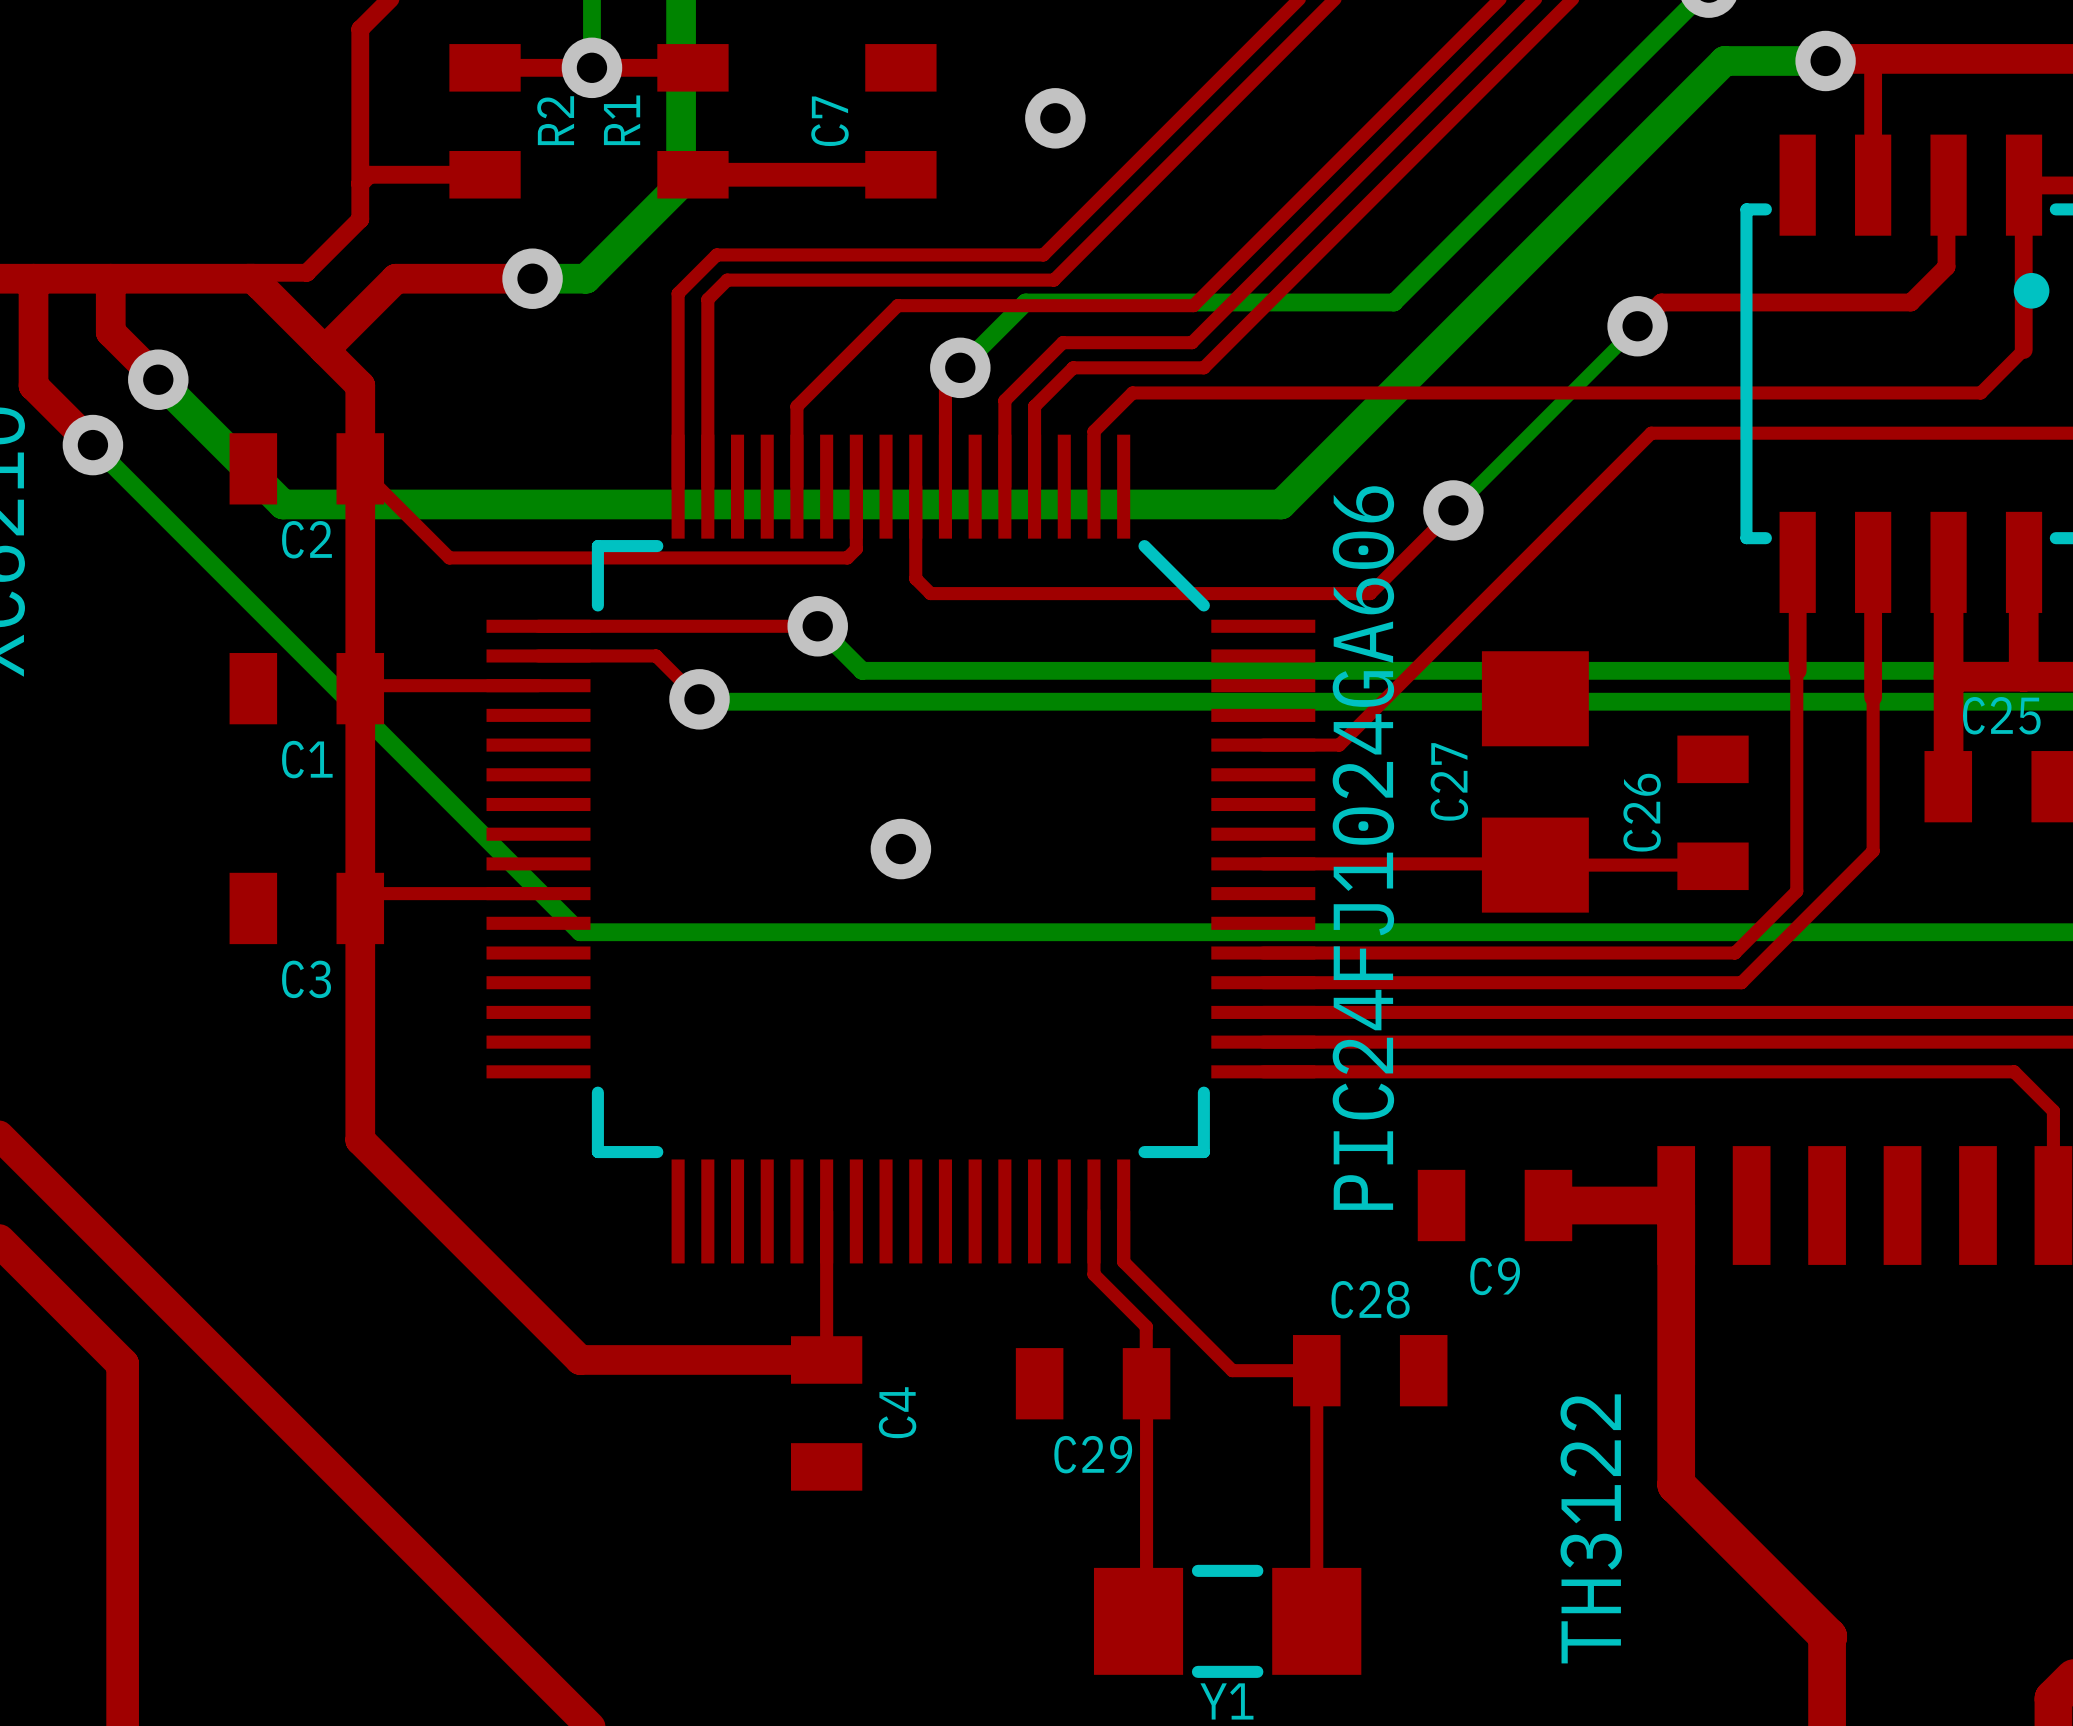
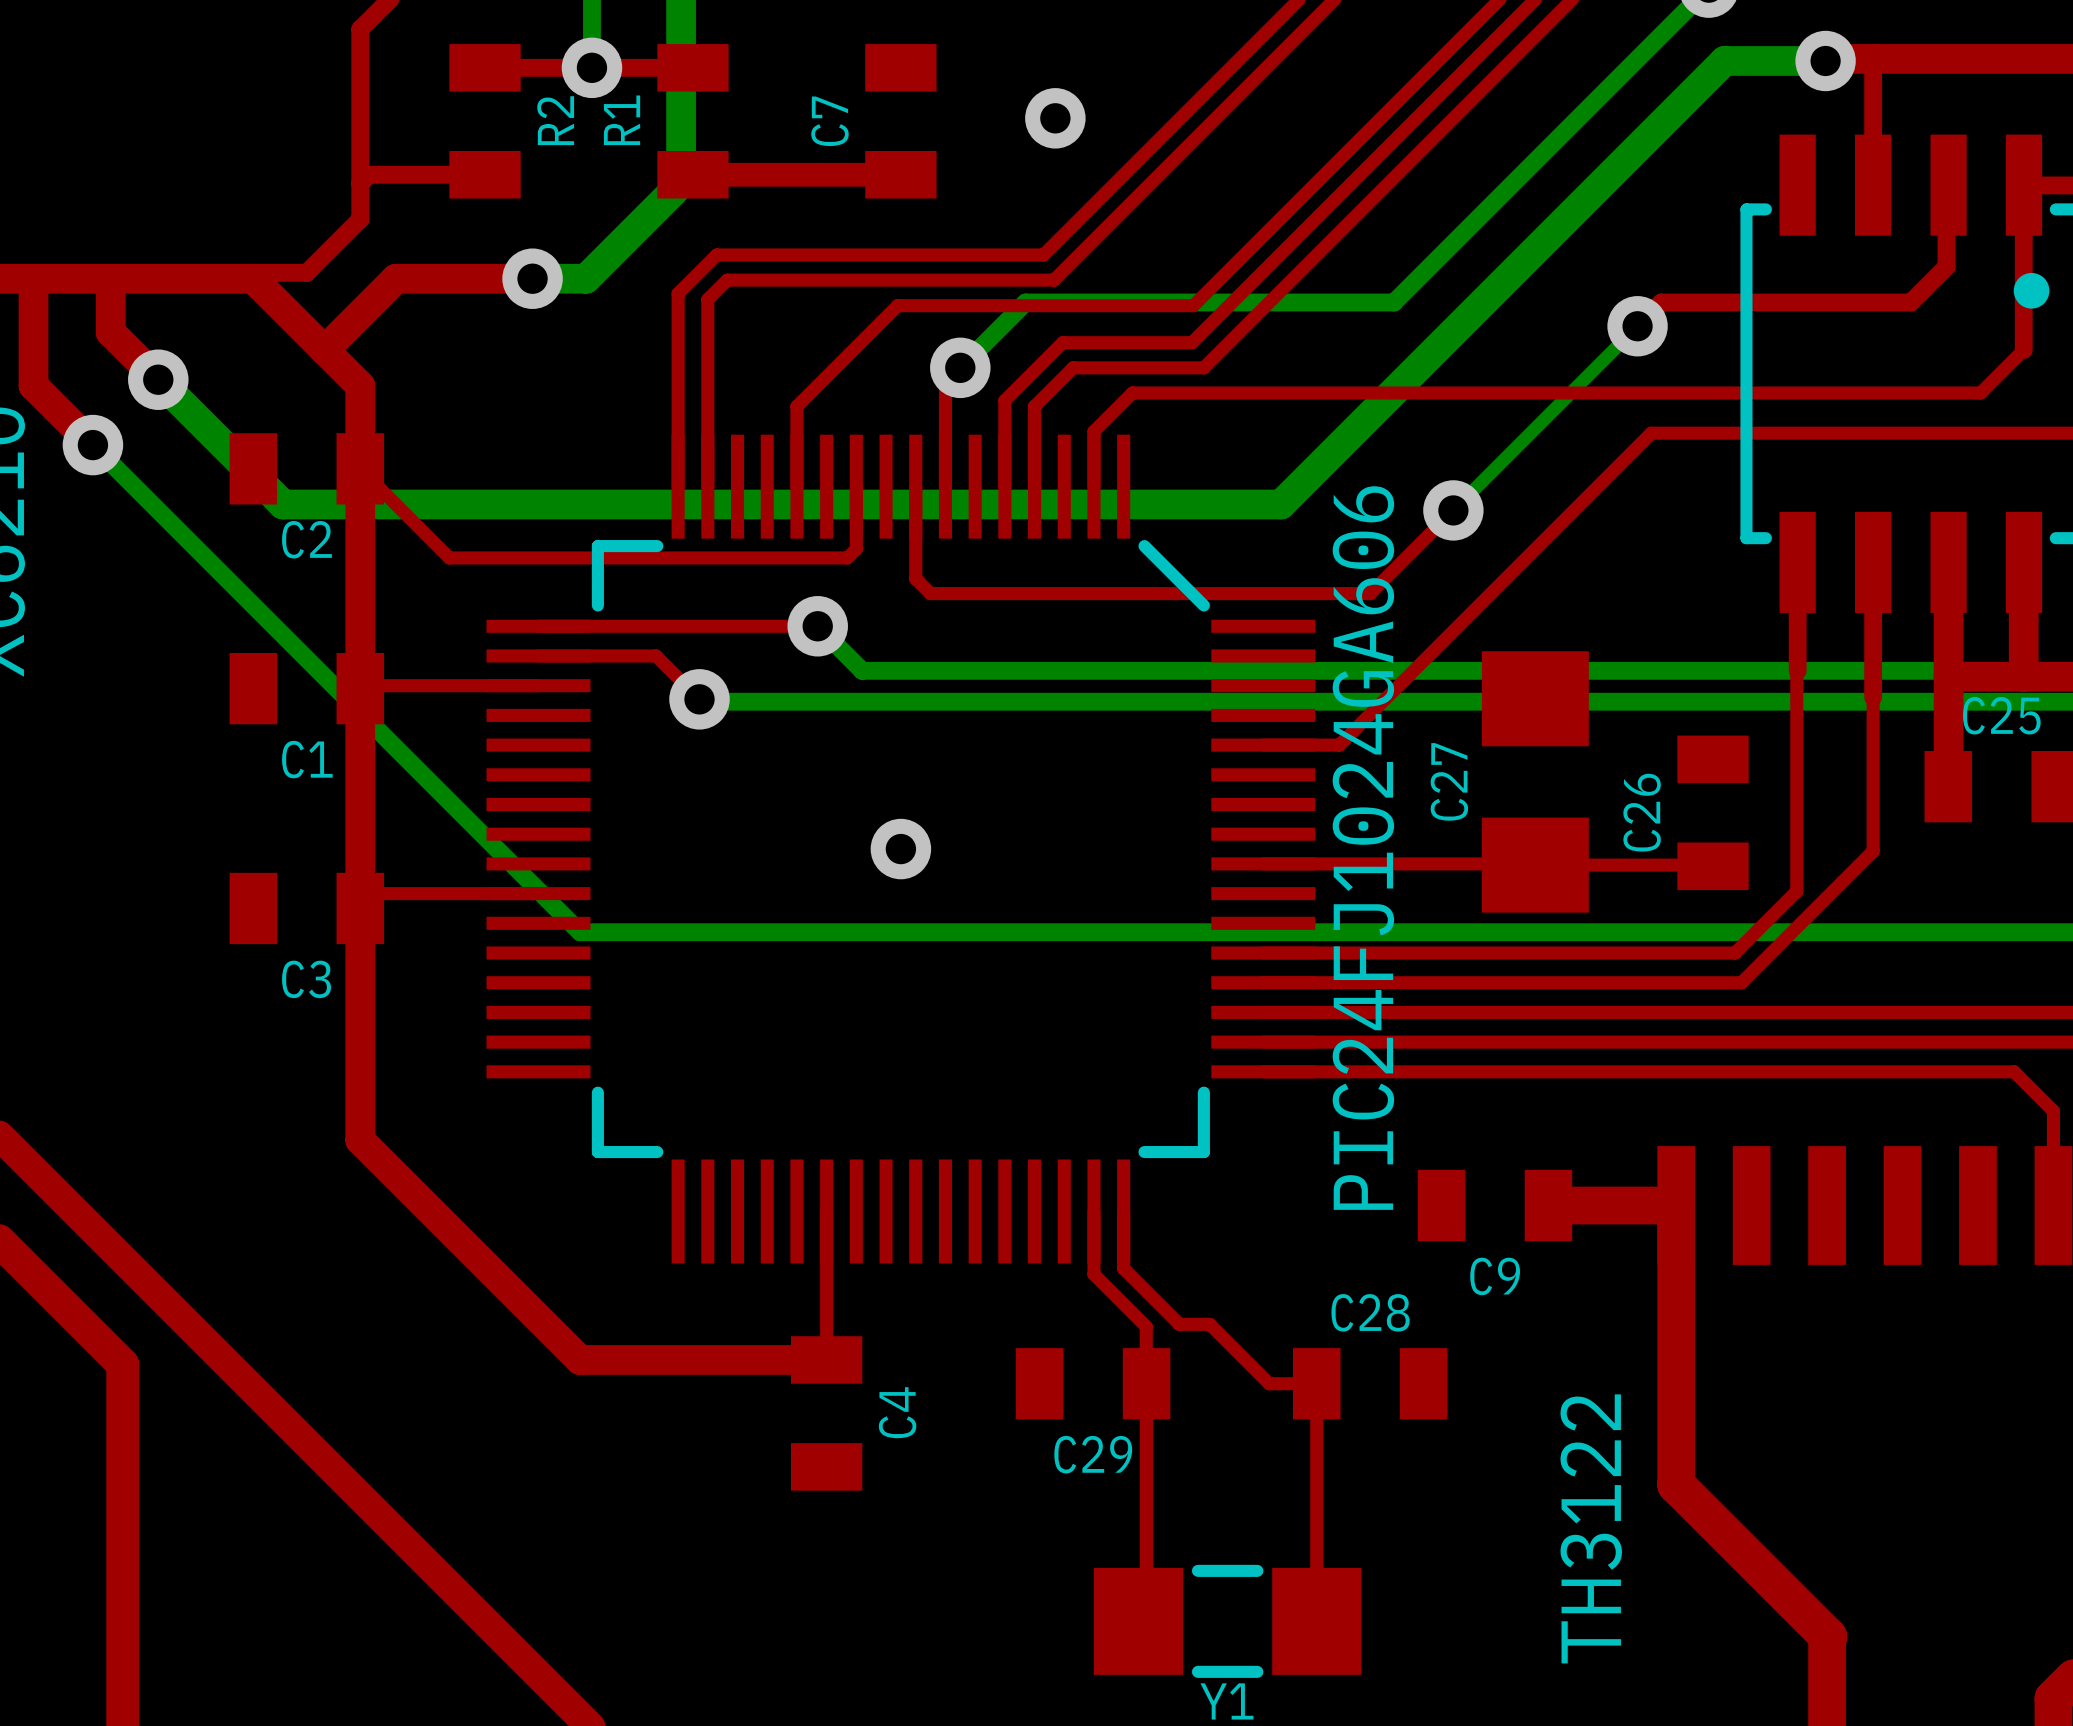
top track: (1123, 1261) (1232, 1370) (1316, 1370) (1316, 1383) -> (1123, 1261) (1123, 1268) (1179, 1324) (1209, 1324) (1269, 1383) (1316, 1383)
C28 position: (1370, 1370) -> (1370, 1383)

